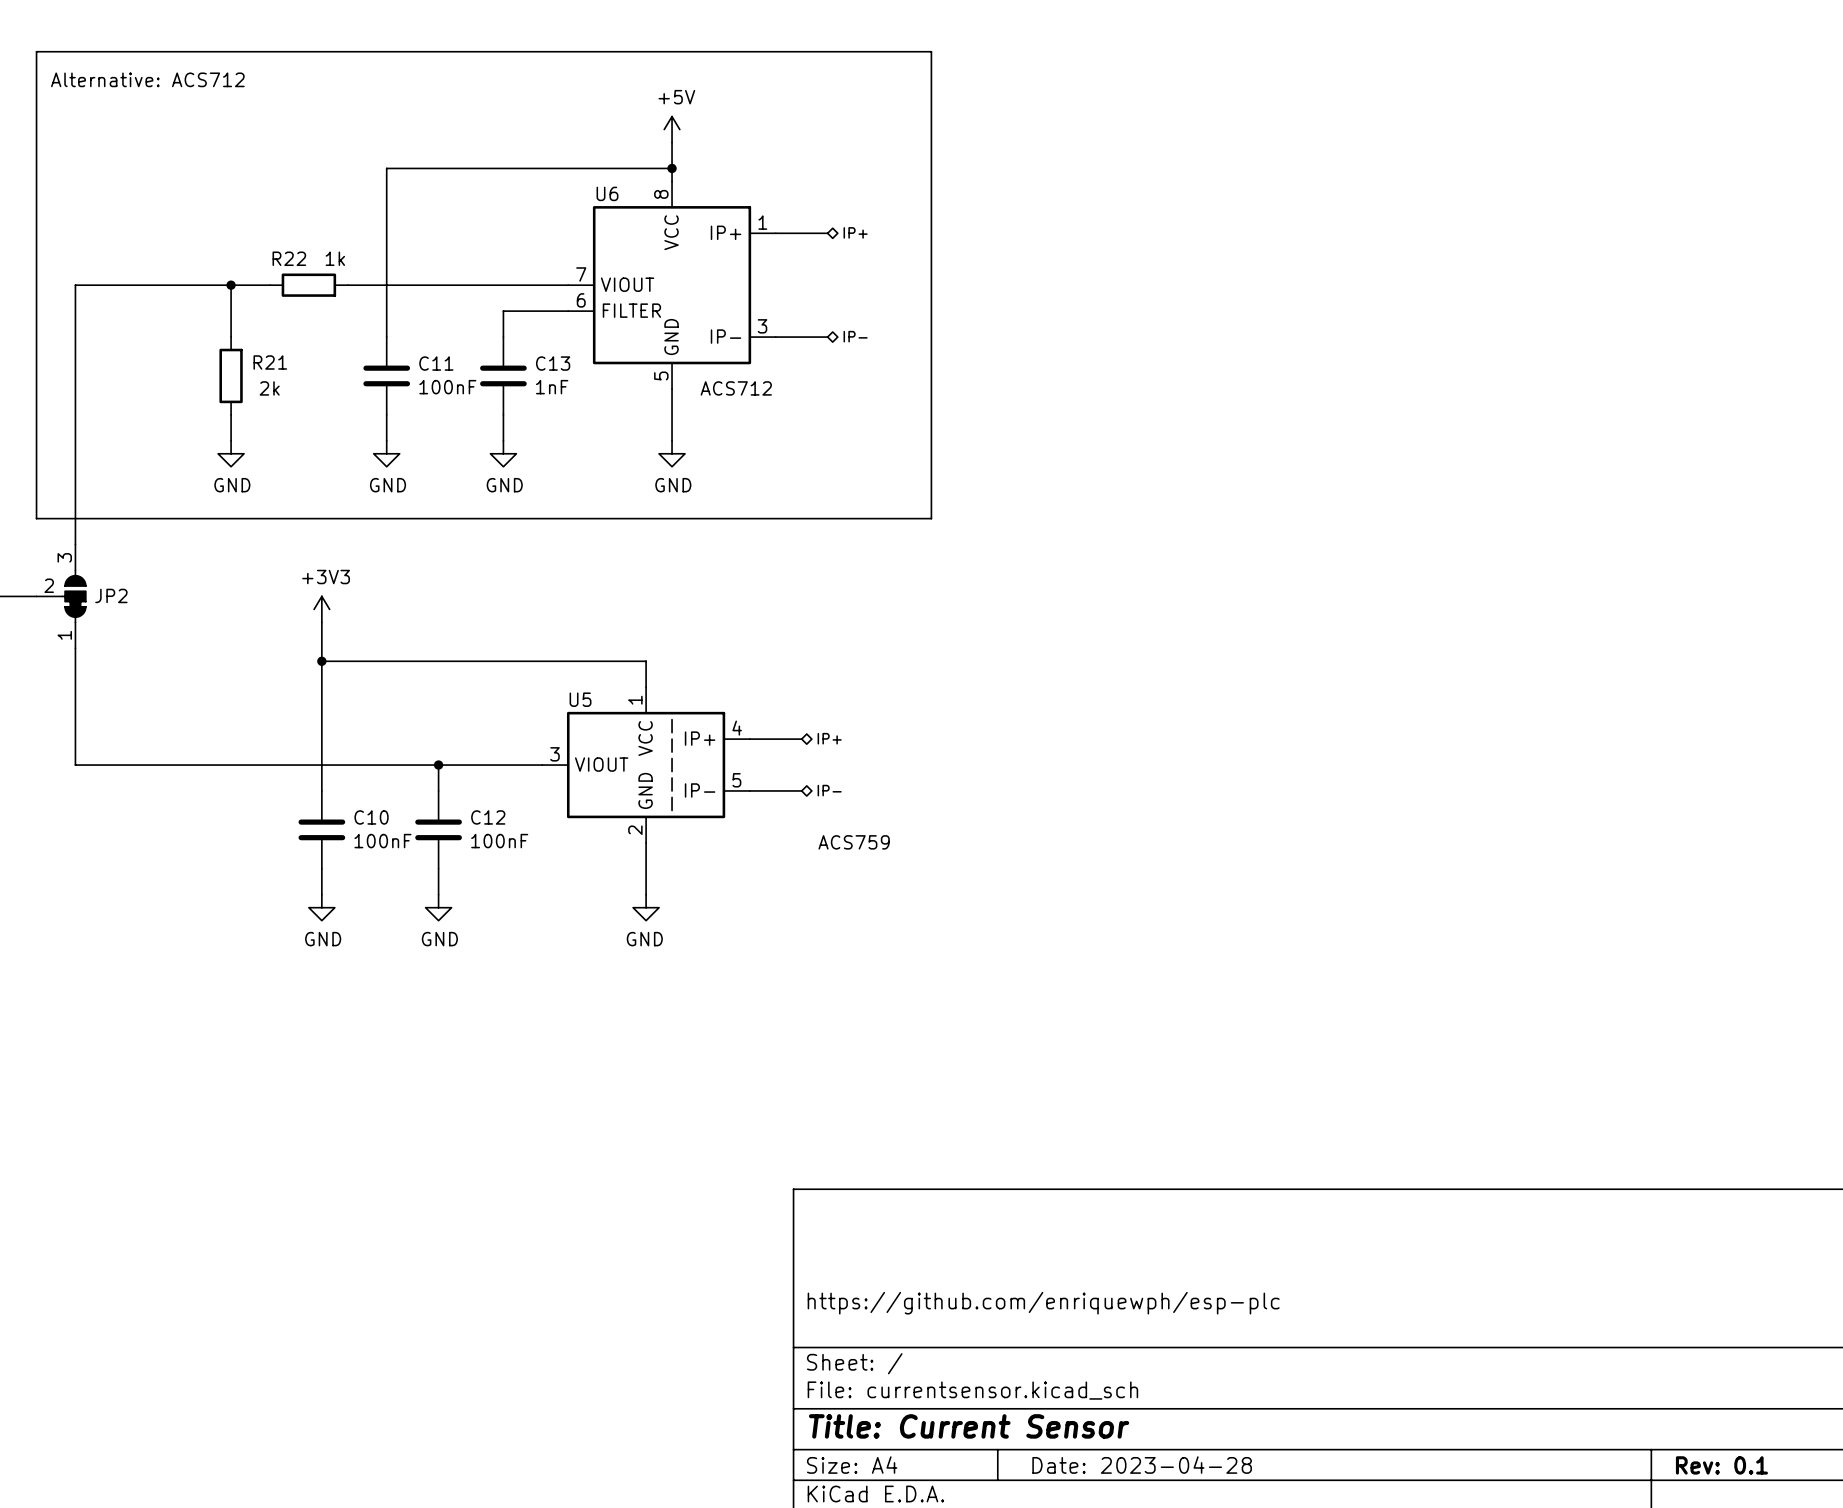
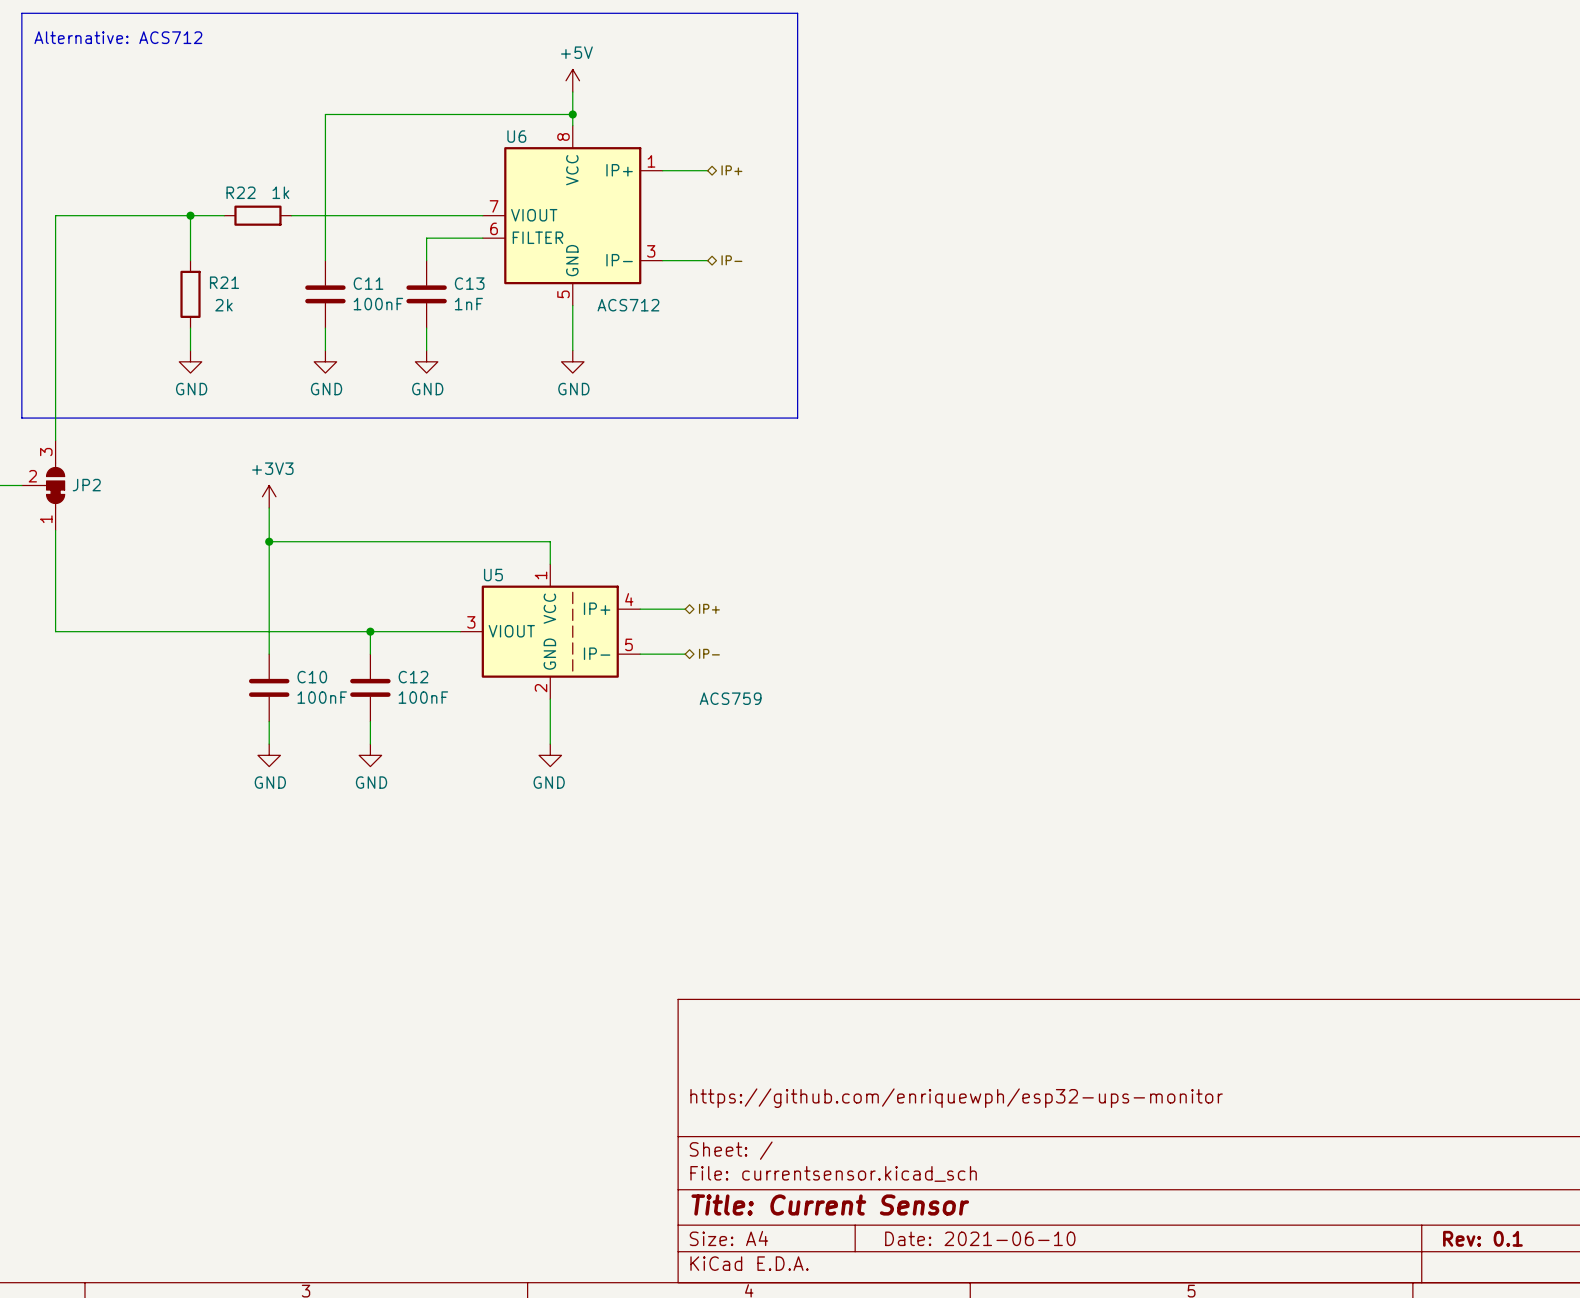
title block: https://github.com/enriquewph/esp-plc (1043, 1303) -> https://github.com/enriquewph/esp32-ups-monitor (956, 1098)
title block: Date: 2023-04-28 (1142, 1465) -> Date: 2021-06-10 (980, 1238)

